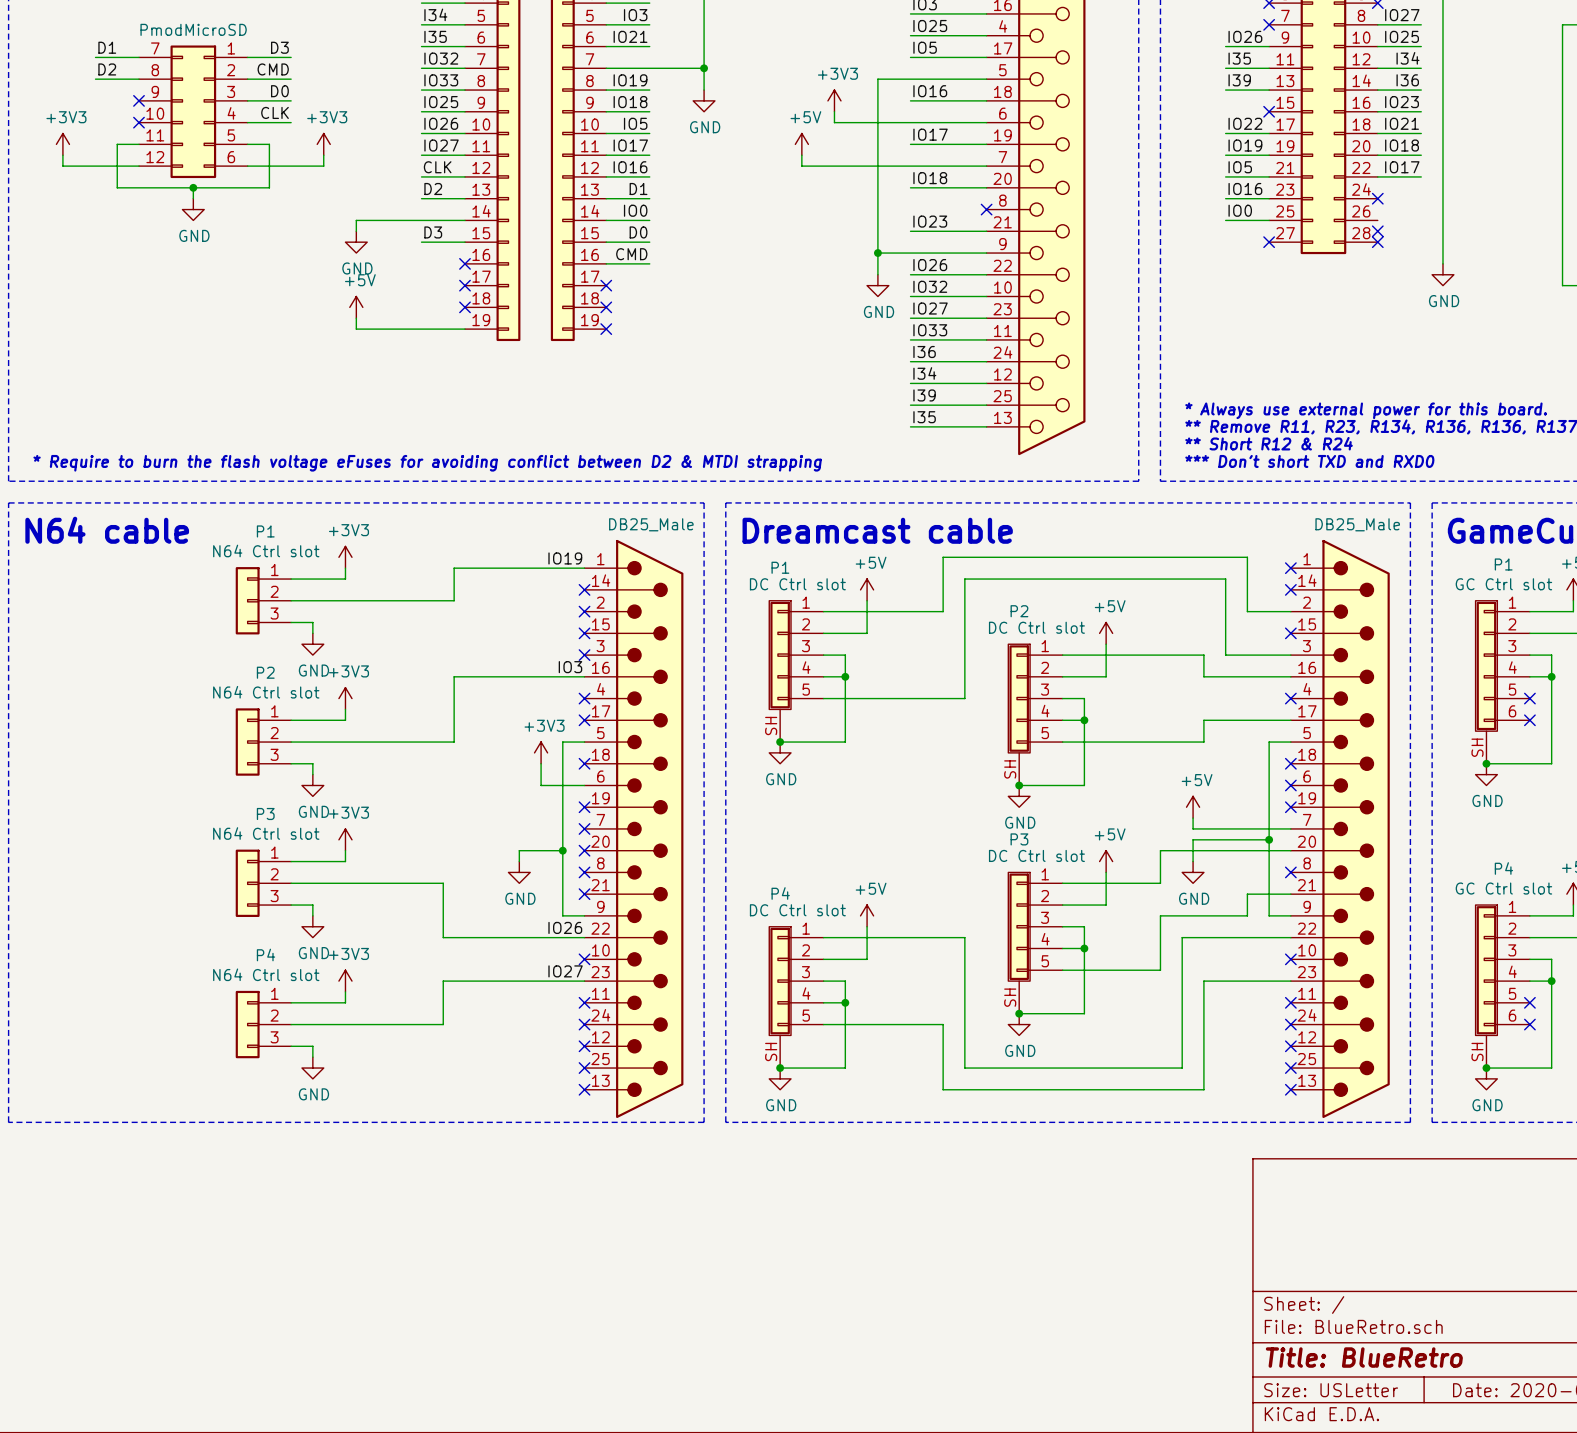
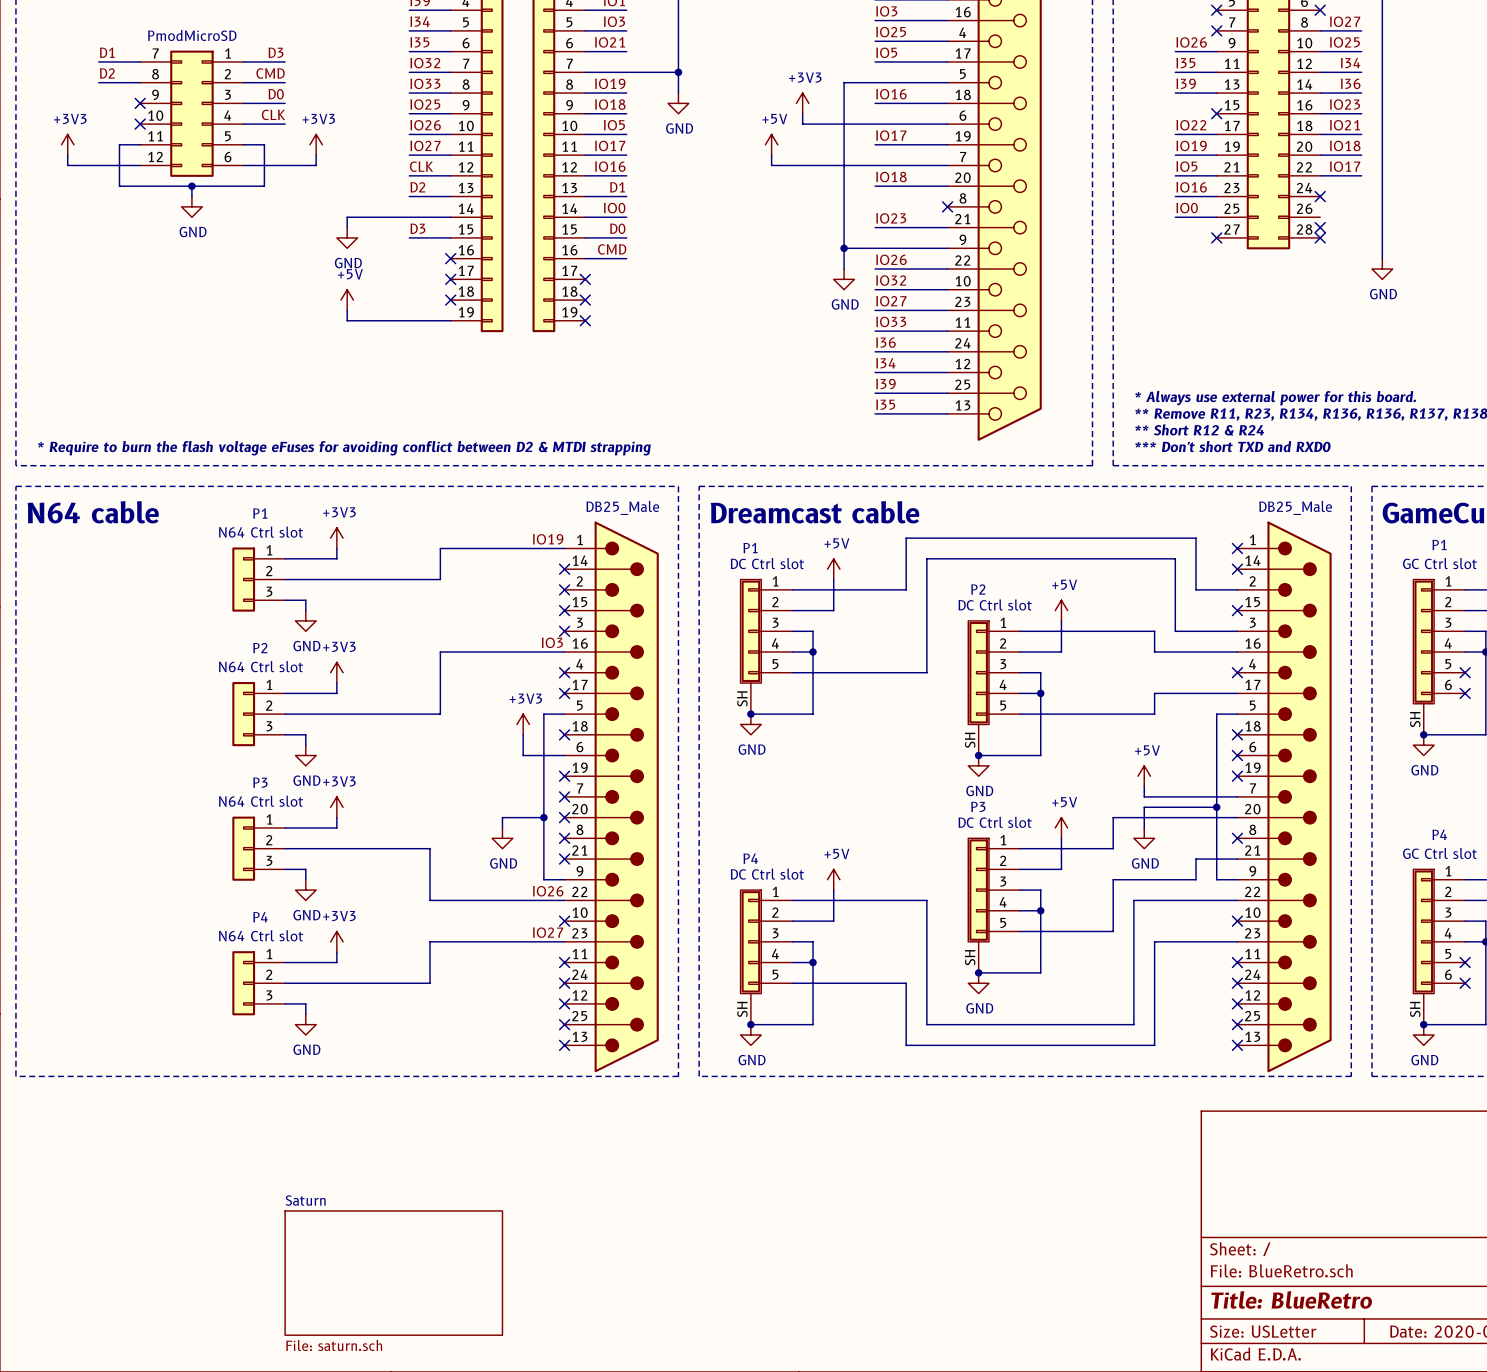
sheet Saturn: none -> File: saturn.sch (393, 1273)

